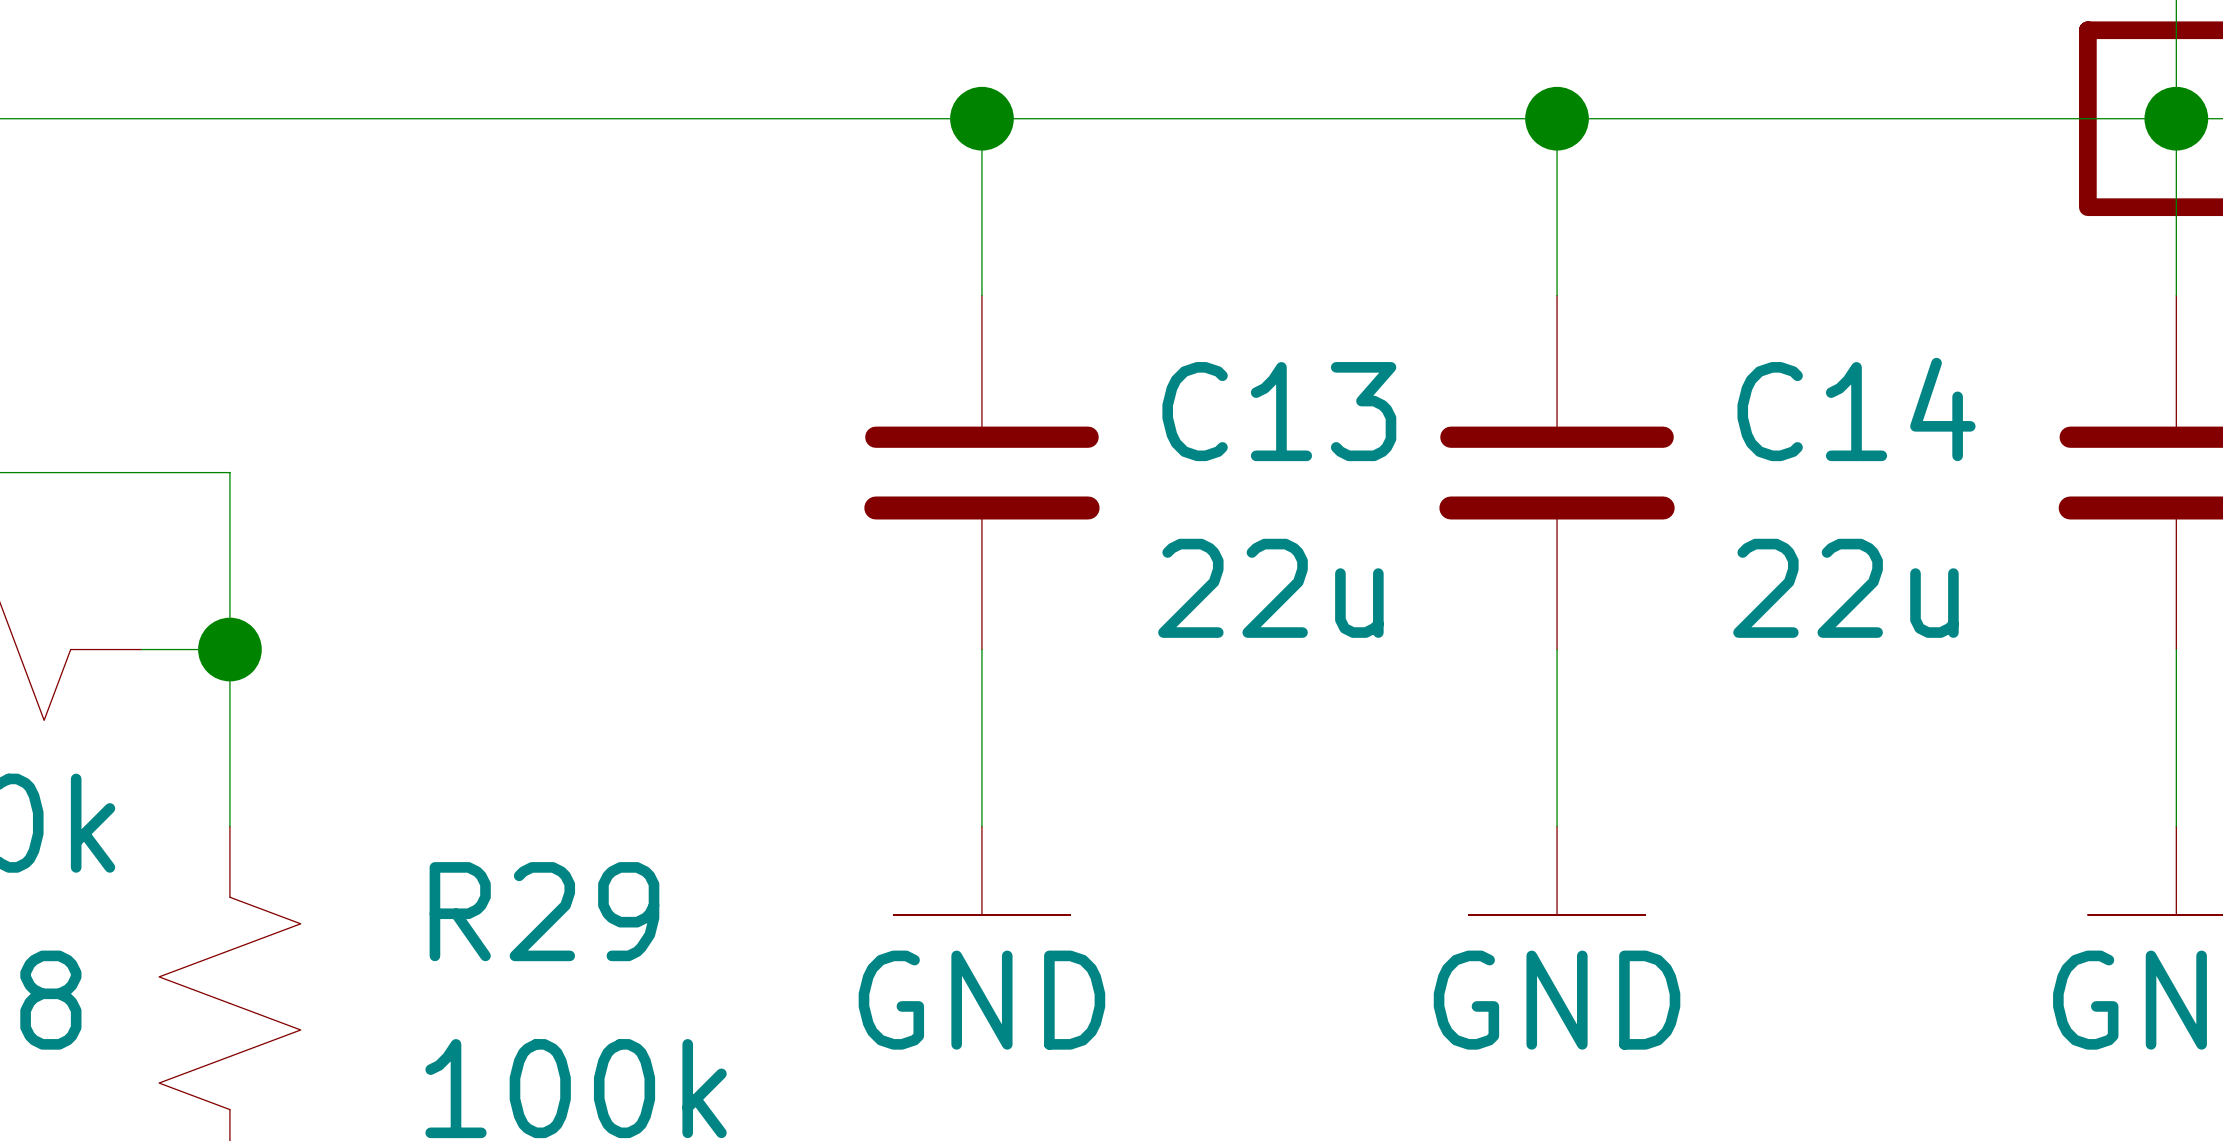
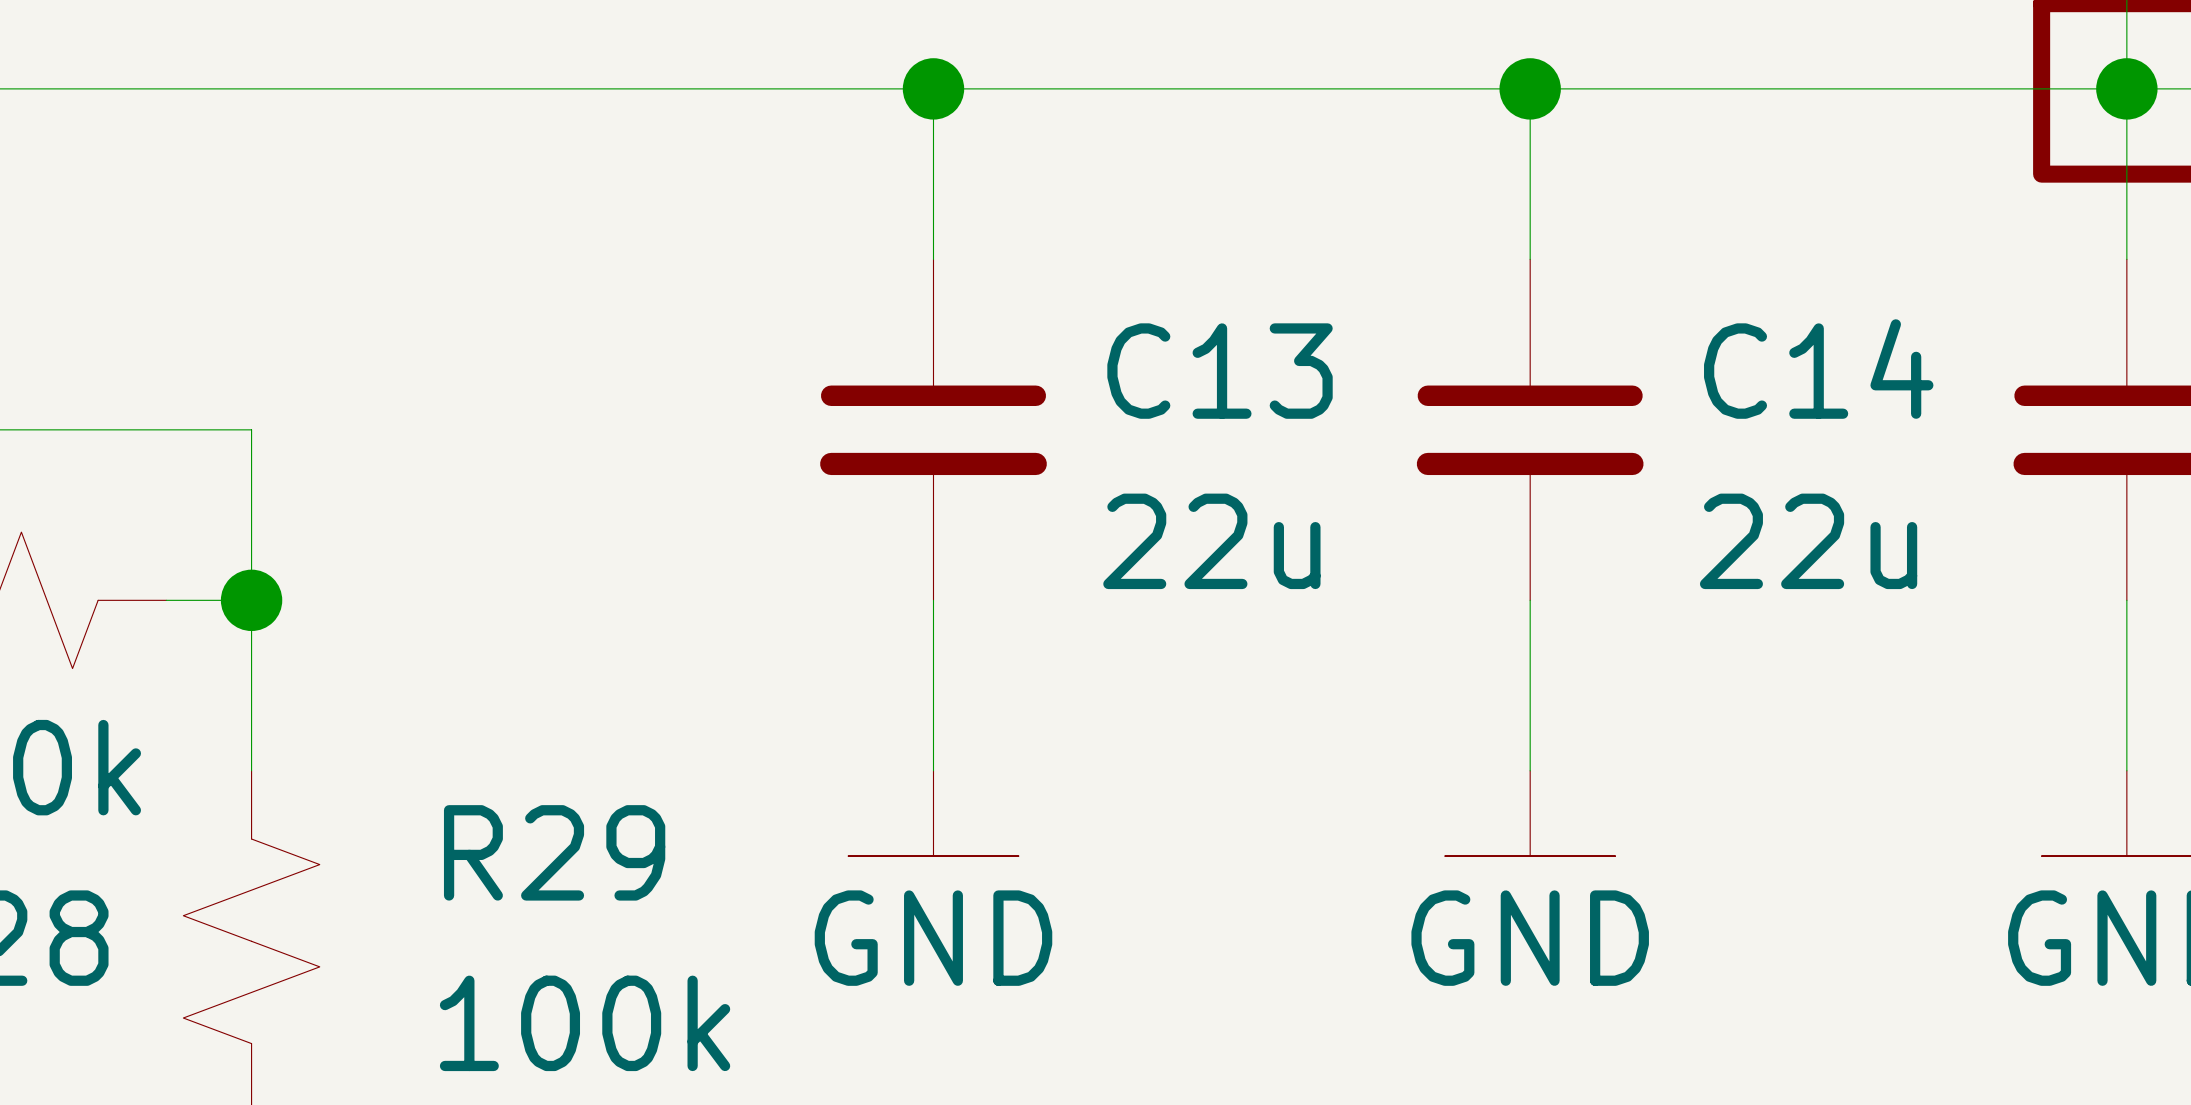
wire: (981, 118) (981, 295) -> (933, 88) (933, 259)
junction position: (981, 118) -> (933, 88)
C13 position: (981, 472) -> (933, 429)
wire: (981, 649) (981, 826) -> (933, 600) (933, 770)
power symbol position: GND (981, 870) -> GND (933, 813)

